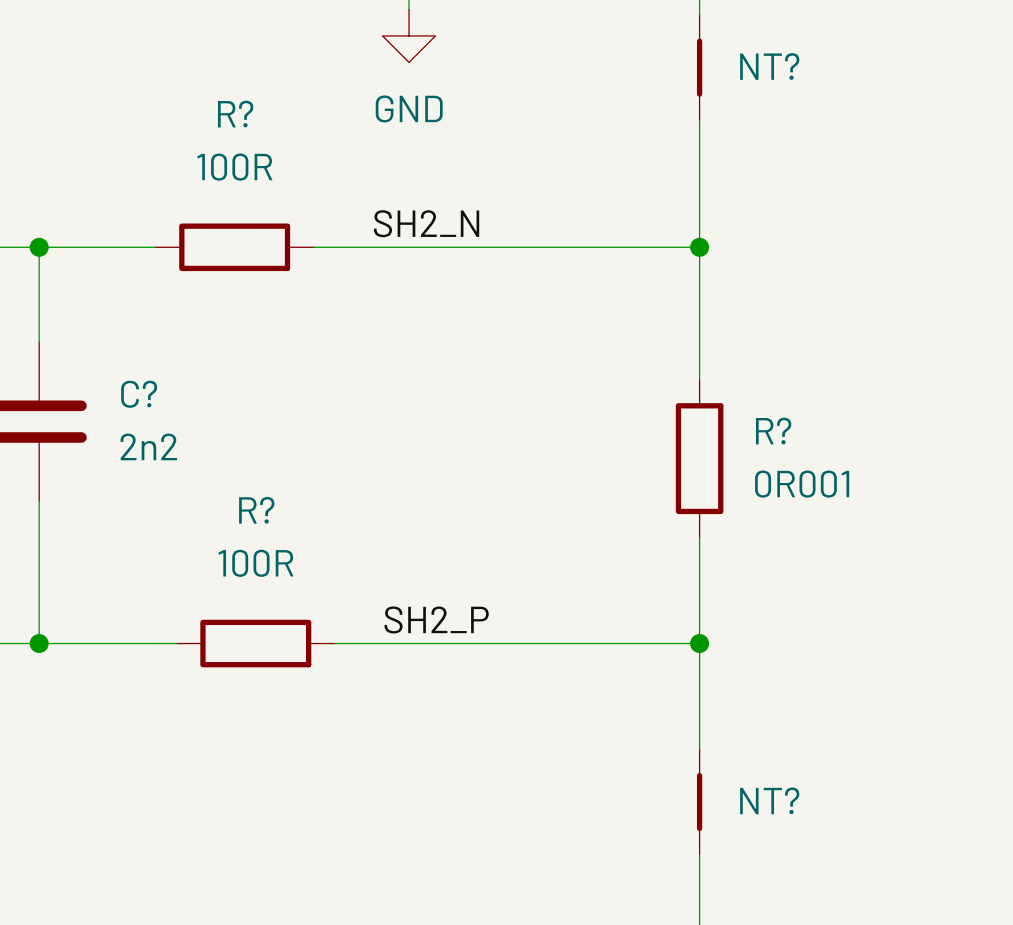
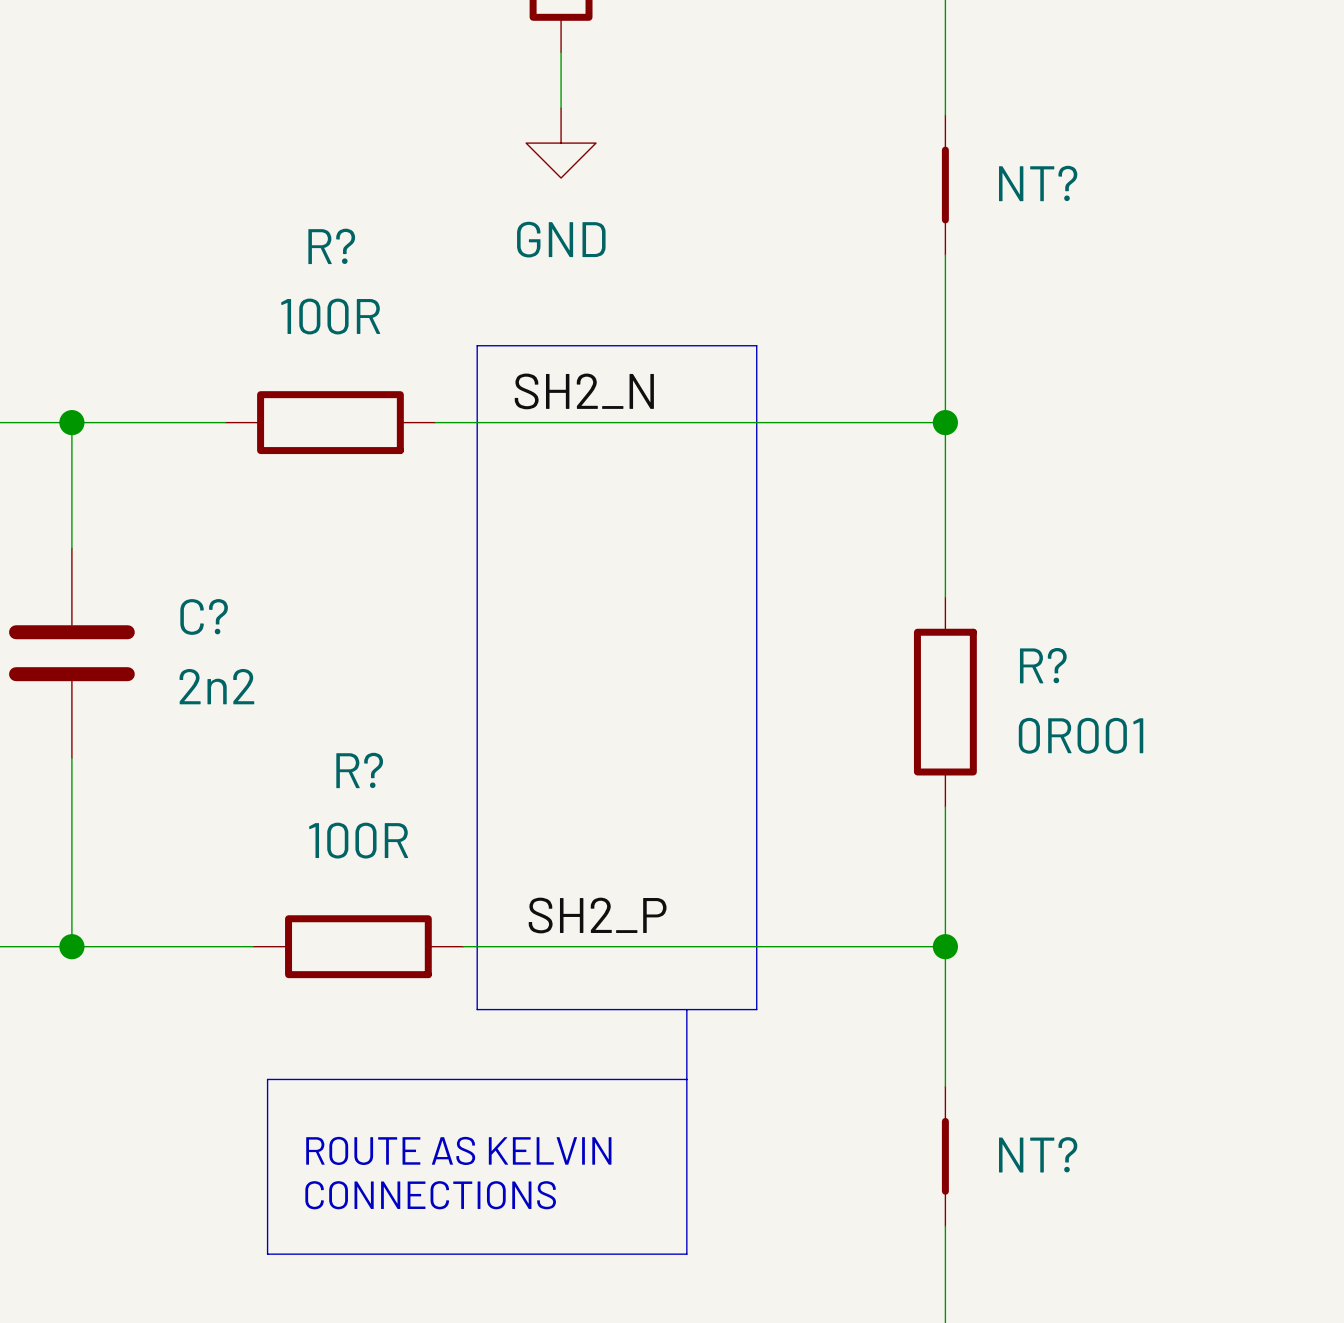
line: none -> (477, 345) (756, 345) (756, 1009) (477, 1009) (477, 345)
line: none -> (686, 1009) (686, 1254) (267, 1254) (267, 1079) (686, 1079)
text: none -> ROUTE AS KELVIN (458, 1150)
text: none -> CONNECTIONS (430, 1195)

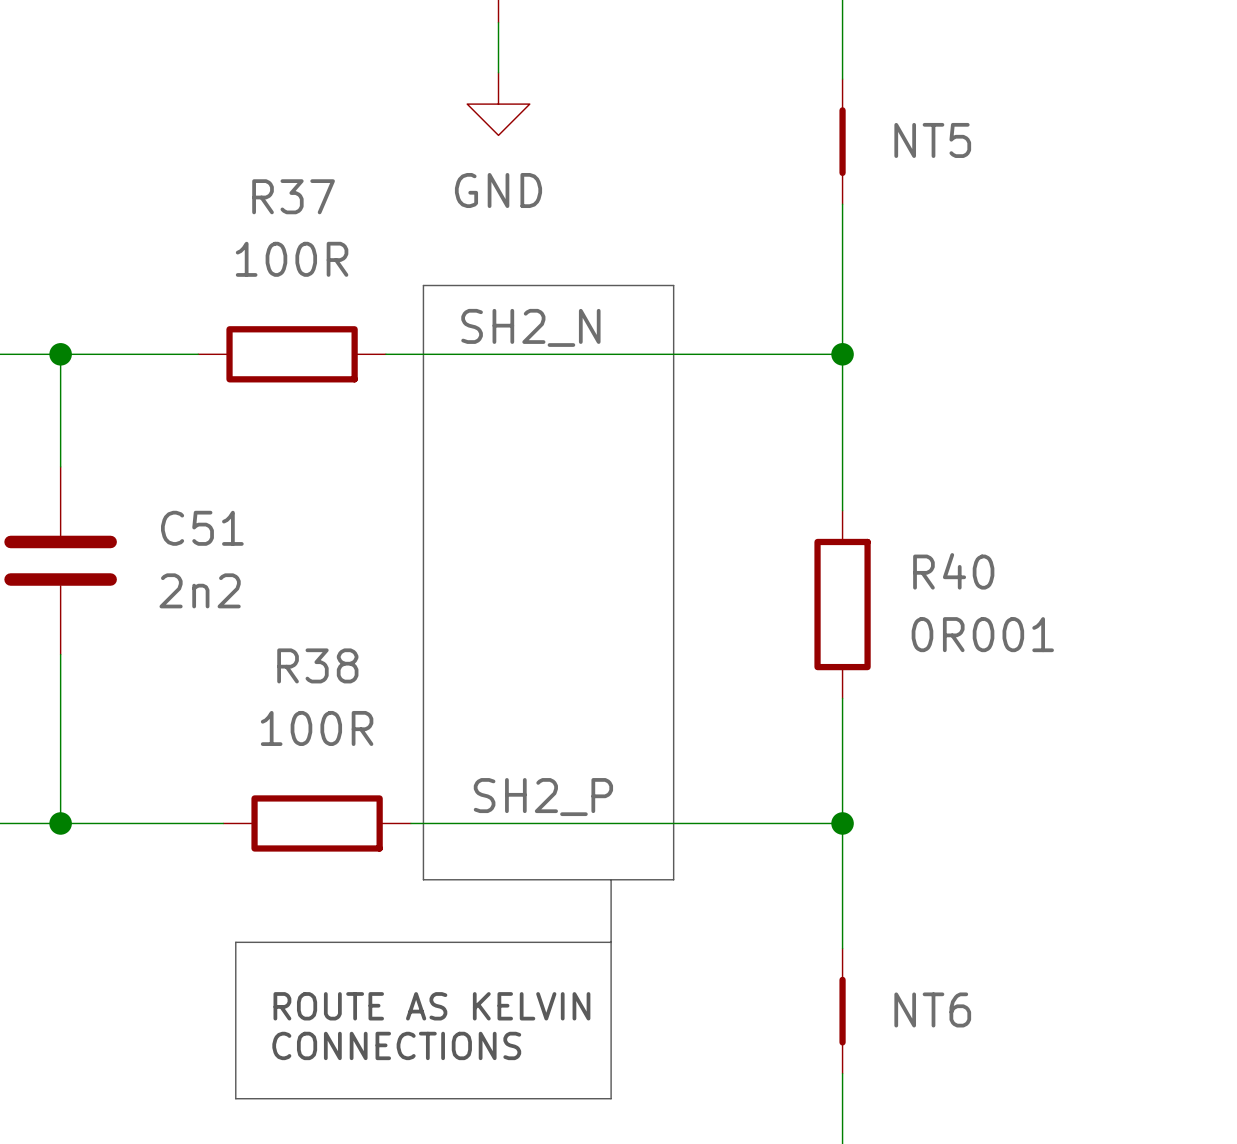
NT? name: NT? (1038, 183) -> NT5 (932, 140)
R? name: R? (331, 246) -> R37 (293, 196)
C? name: C? (204, 616) -> C51 (202, 528)
R? name: R? (1043, 665) -> R40 (953, 571)
R? name: R? (359, 770) -> R38 (317, 665)
NT? name: NT? (1038, 1154) -> NT6 (932, 1009)

